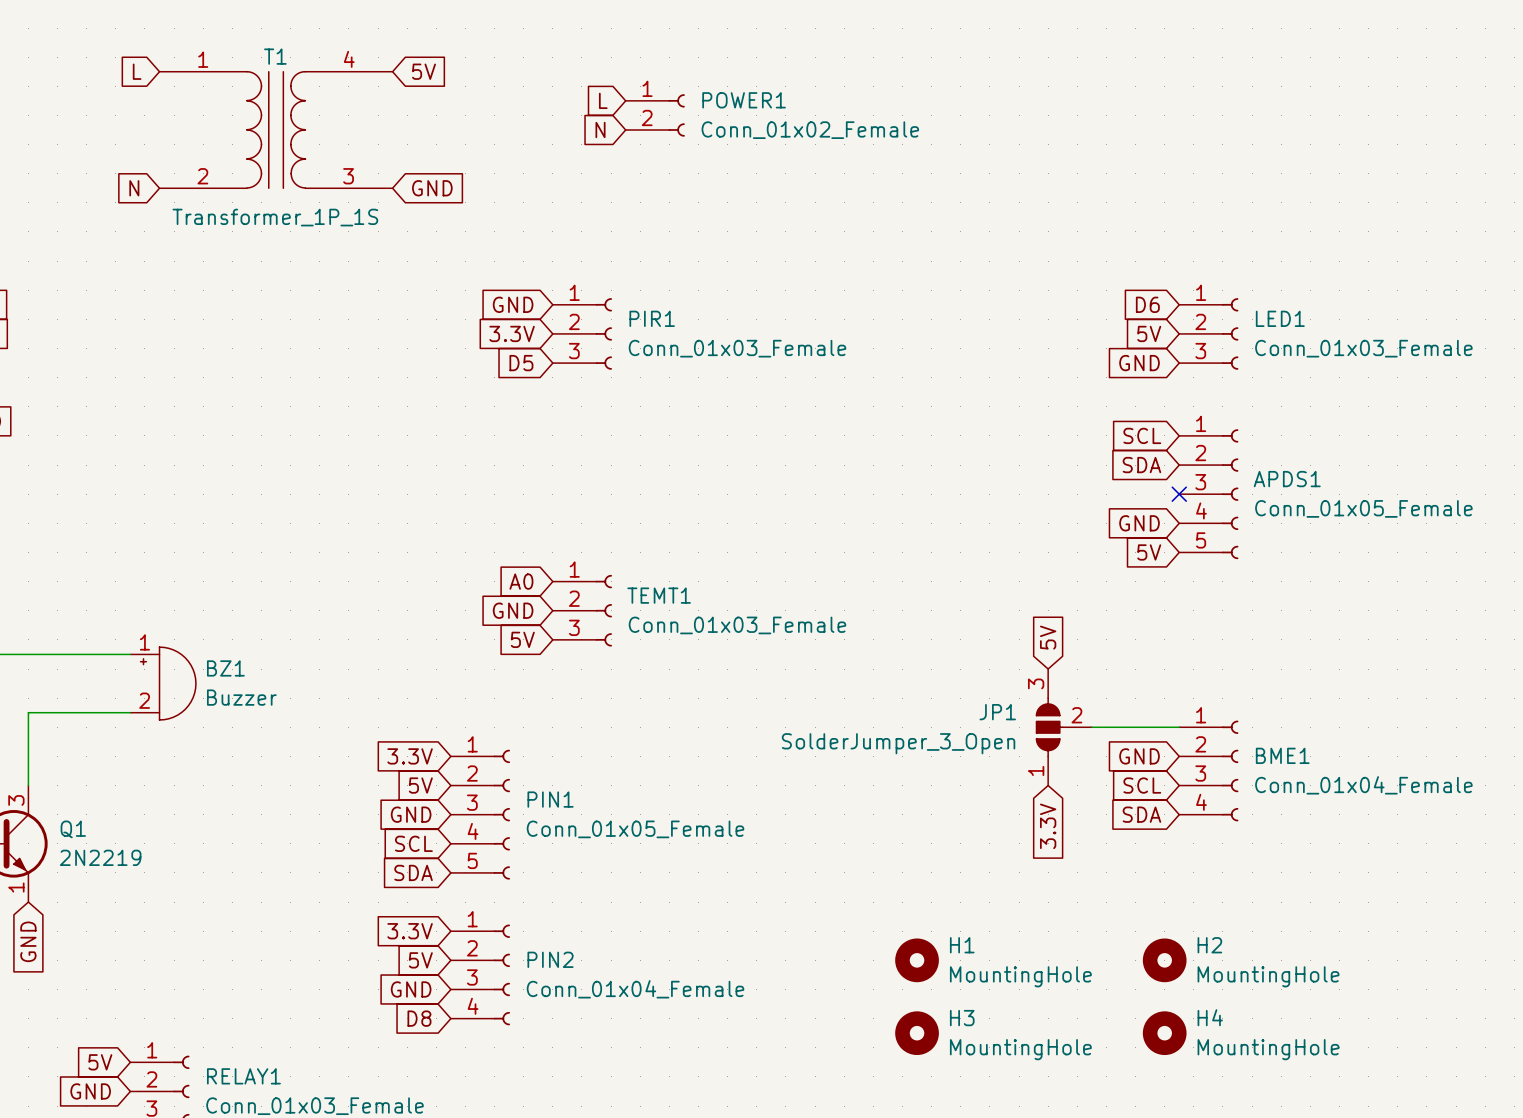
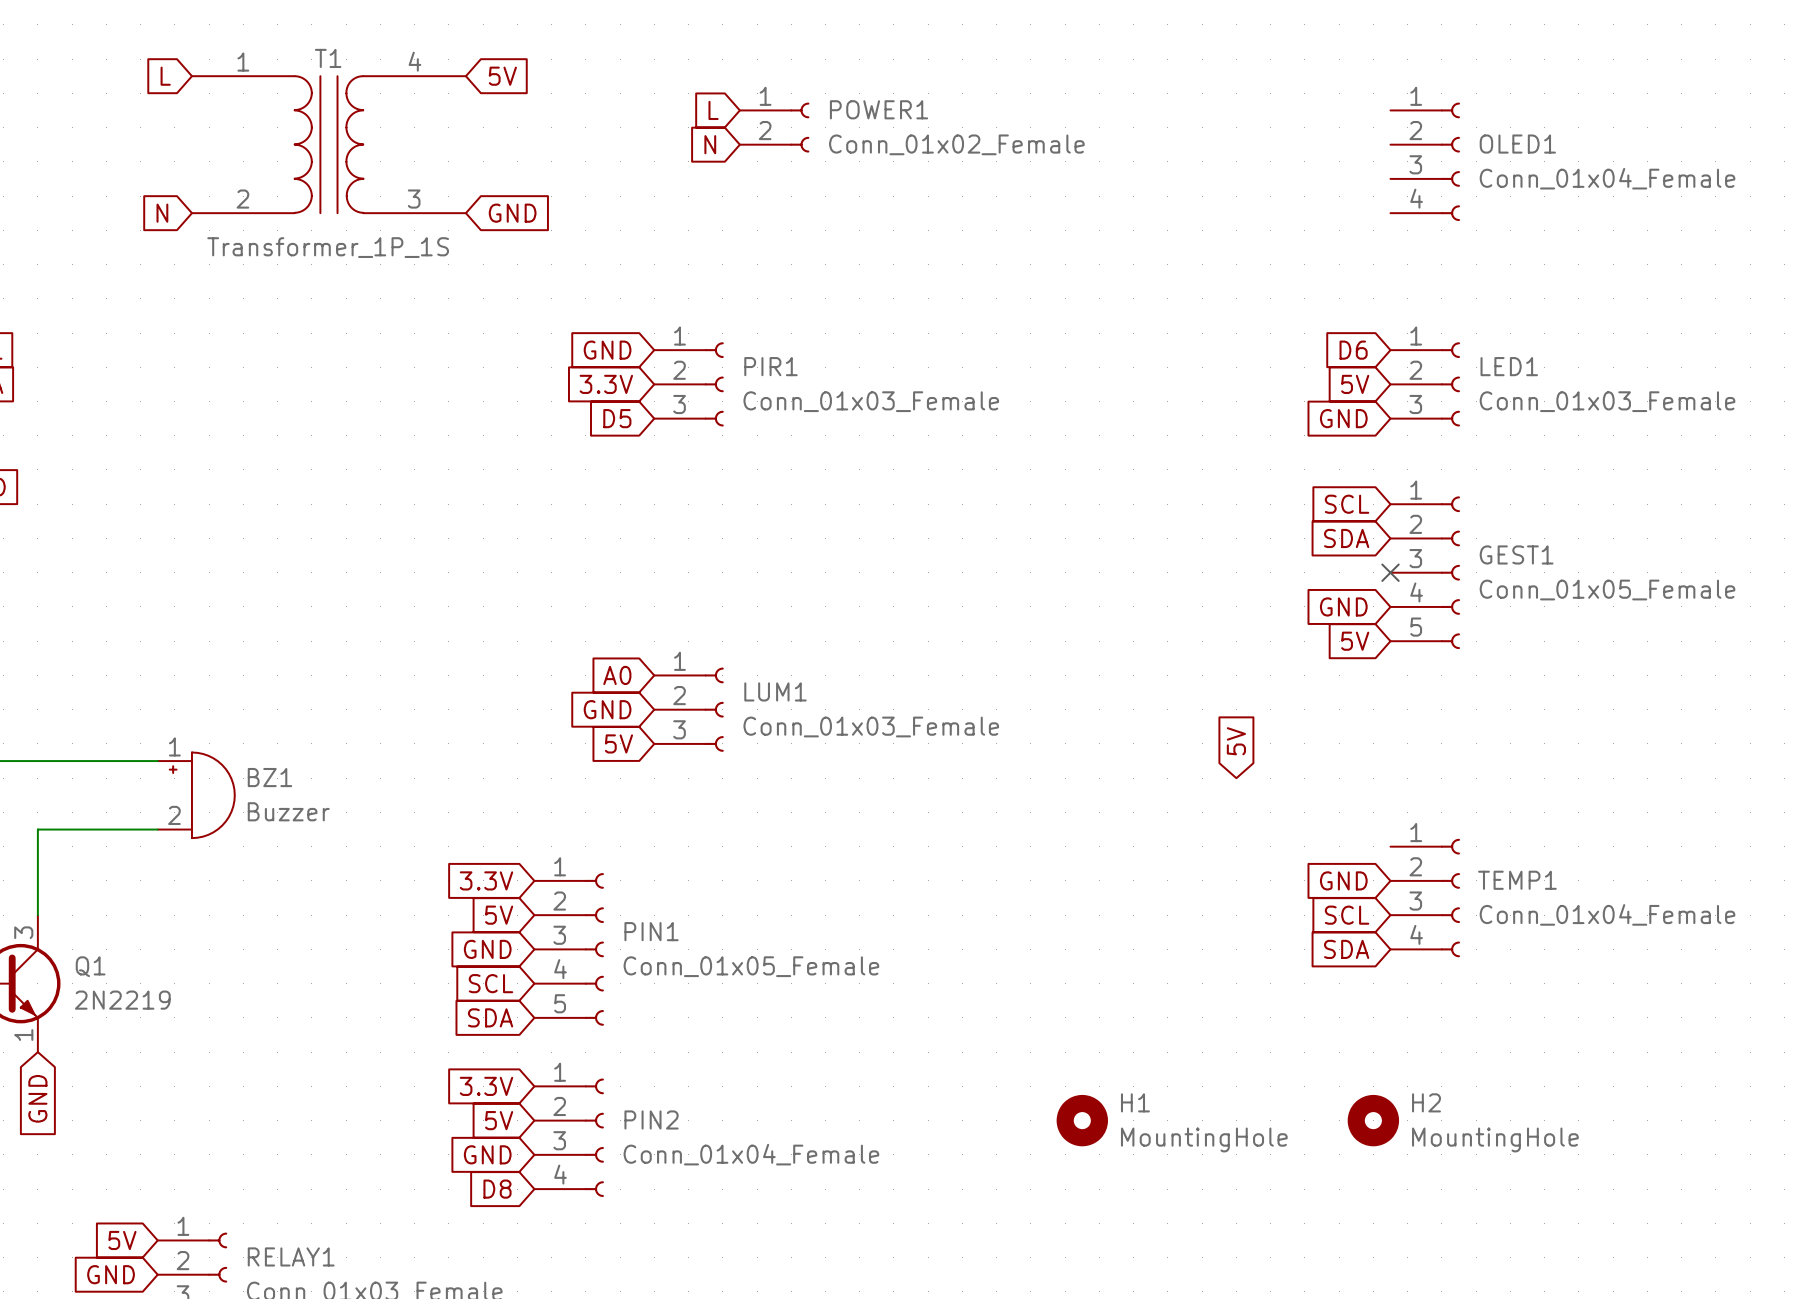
OLED1: none -> Conn_01x04_Female (1425, 161)
APDS1 name: APDS1 (1287, 479) -> GEST1 (1516, 554)
TEMT1 name: TEMT1 (659, 595) -> LUM1 (775, 691)
JP1: SolderJumper_3_Open (1064, 727) -> none
wire: (1091, 727) (1179, 727) -> none
BME1 name: BME1 (1282, 755) -> TEMP1 (1517, 880)
global label: 3.3V (1048, 826) -> none
H3: MountingHole (917, 1033) -> none
H4: MountingHole (1164, 1033) -> none

